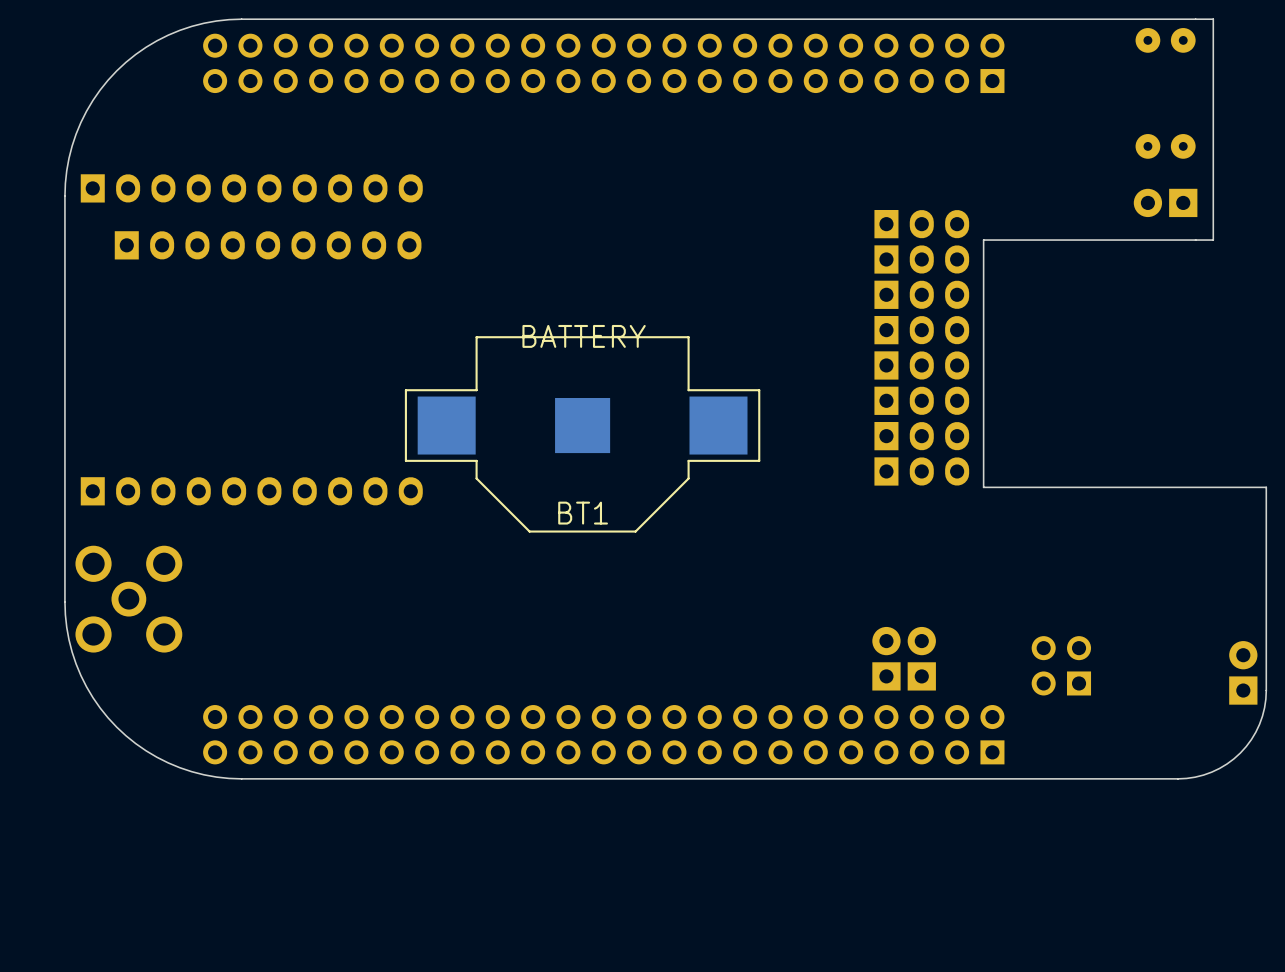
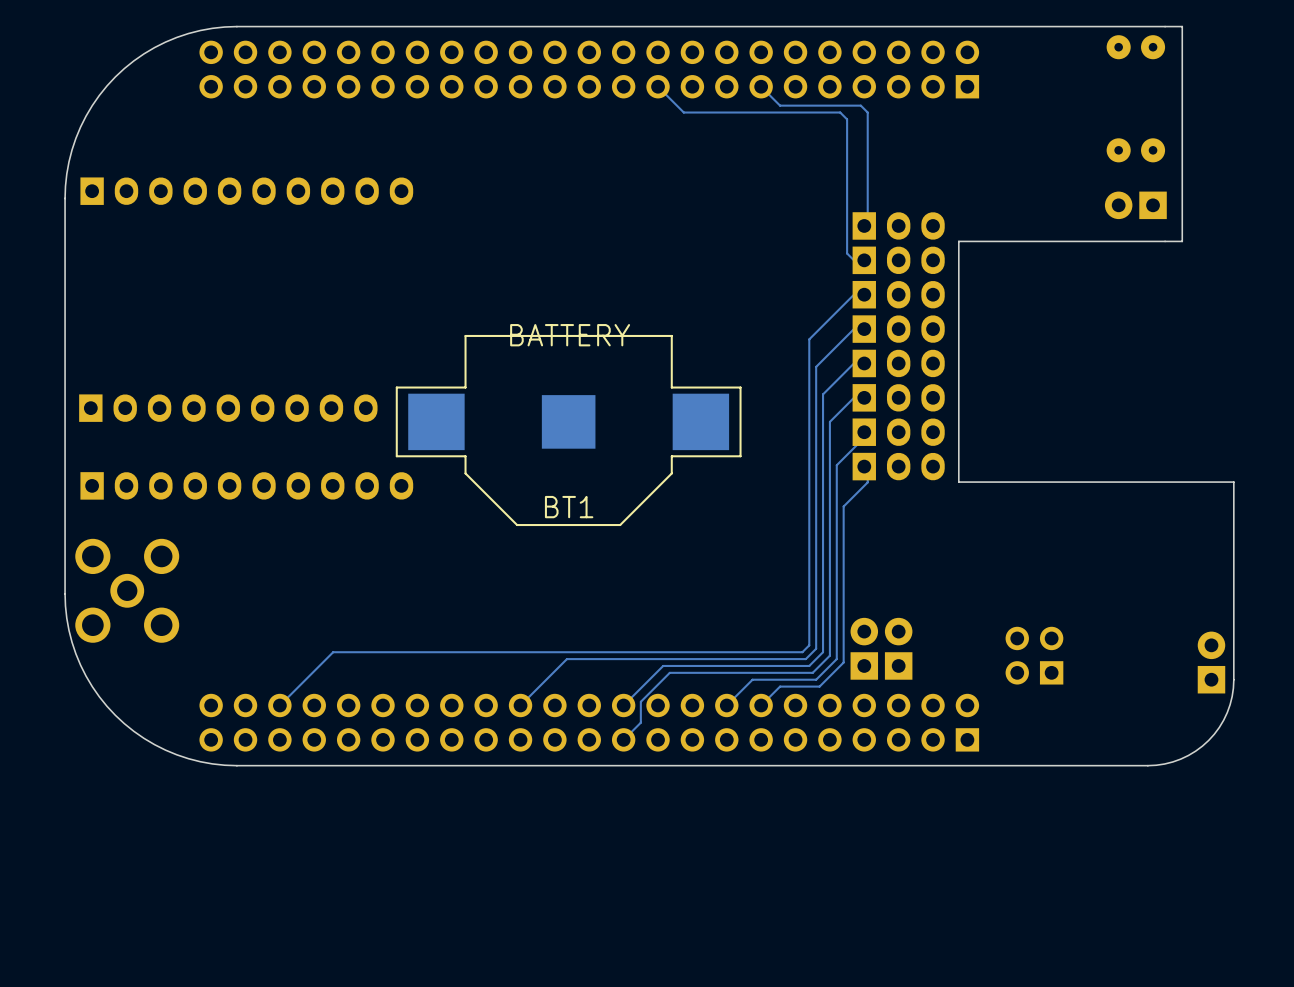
track: none -> (658, 86) (683, 112) (840, 112) (847, 119) (847, 253) (853, 260) (867, 260)
track: none -> (761, 86) (780, 105) (860, 105) (867, 112) (867, 225)
part position: (268, 245) -> (228, 408)
track: none -> (867, 294) (853, 294) (809, 339) (809, 645) (802, 652) (333, 652) (279, 705)
track: none -> (867, 329) (853, 329) (816, 366) (816, 648) (805, 659) (566, 659) (520, 705)
track: none -> (867, 363) (853, 363) (823, 394) (823, 652) (809, 665) (663, 665) (623, 705)
track: none -> (867, 397) (853, 397) (829, 421) (829, 655) (812, 672) (669, 672) (640, 701) (640, 722) (623, 739)
track: none -> (867, 432) (836, 465) (836, 659) (816, 679) (752, 679) (726, 705)
track: none -> (867, 466) (867, 482) (843, 506) (843, 662) (819, 686) (780, 686) (761, 705)

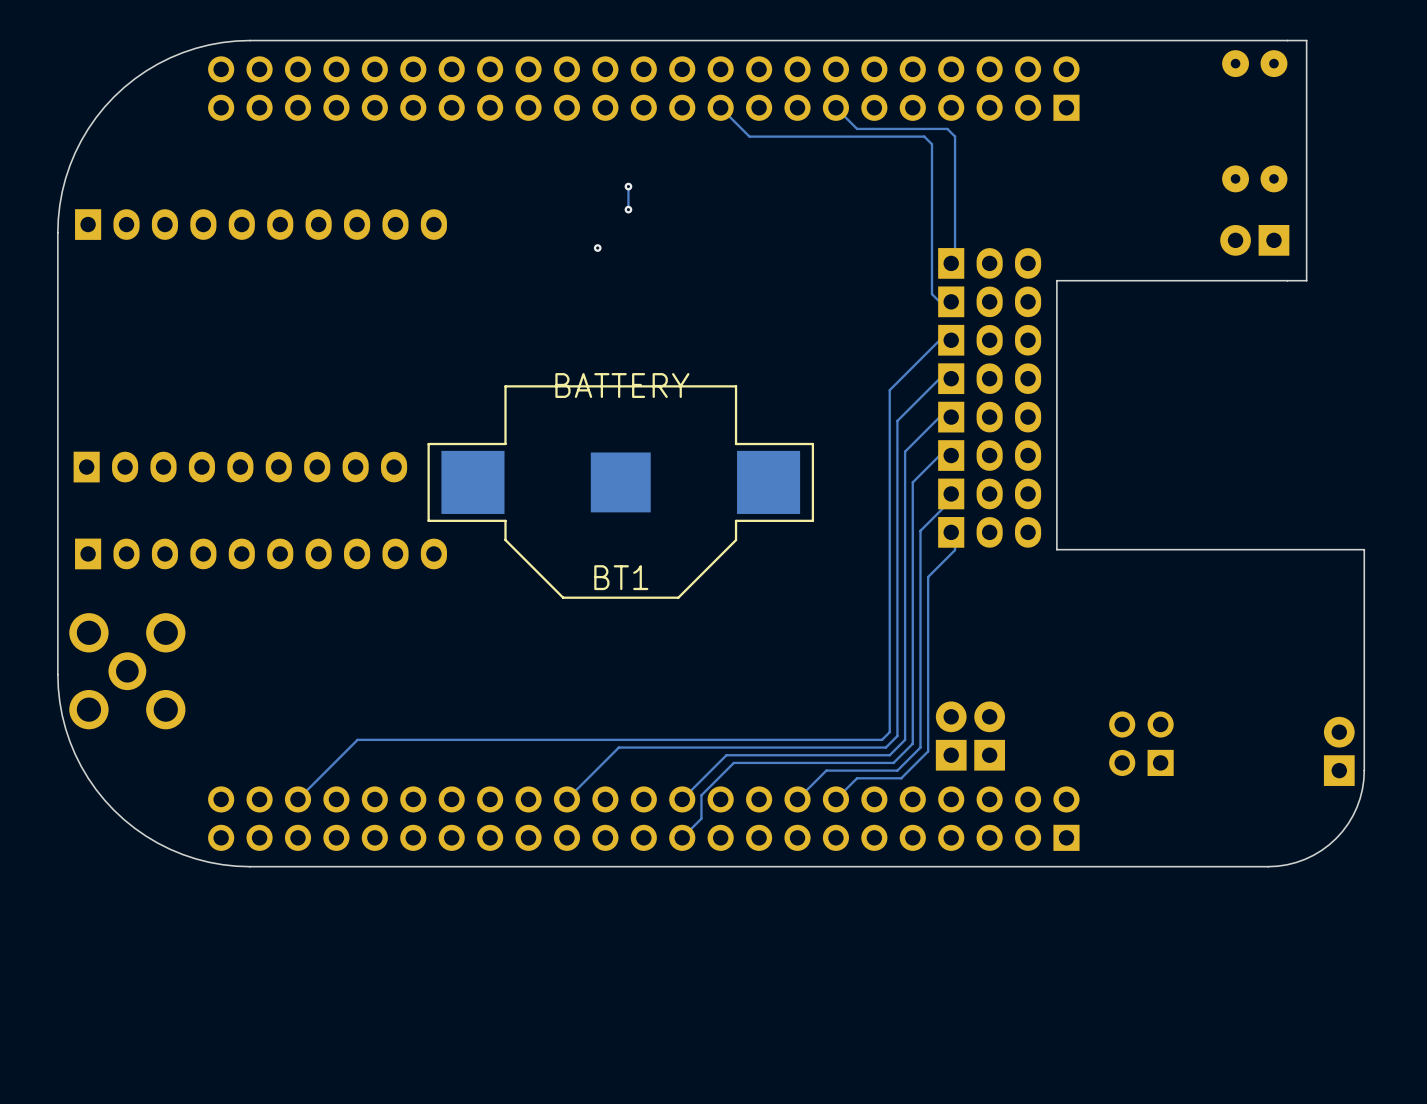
track: none -> (628, 186) (628, 209)
via: none -> (628, 186)
via: none -> (628, 209)
via: none -> (597, 248)

